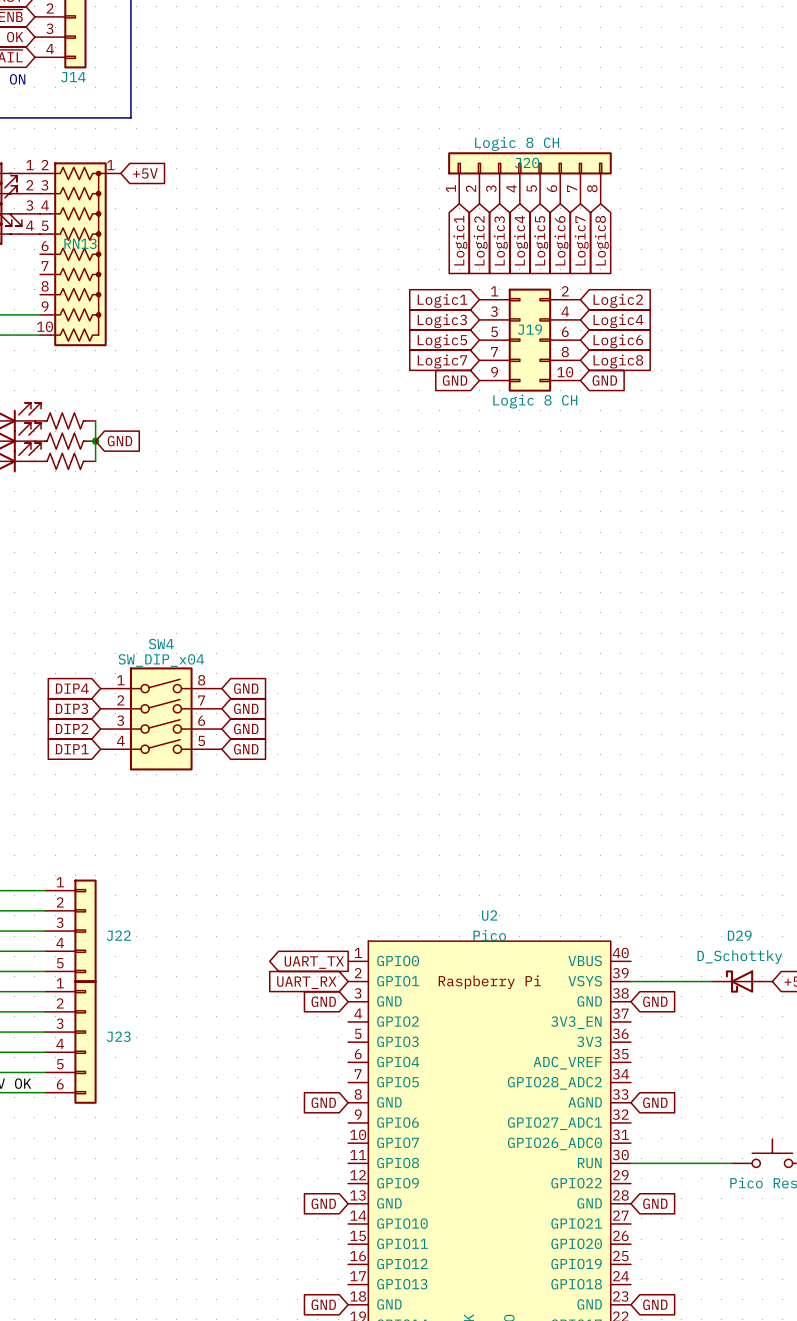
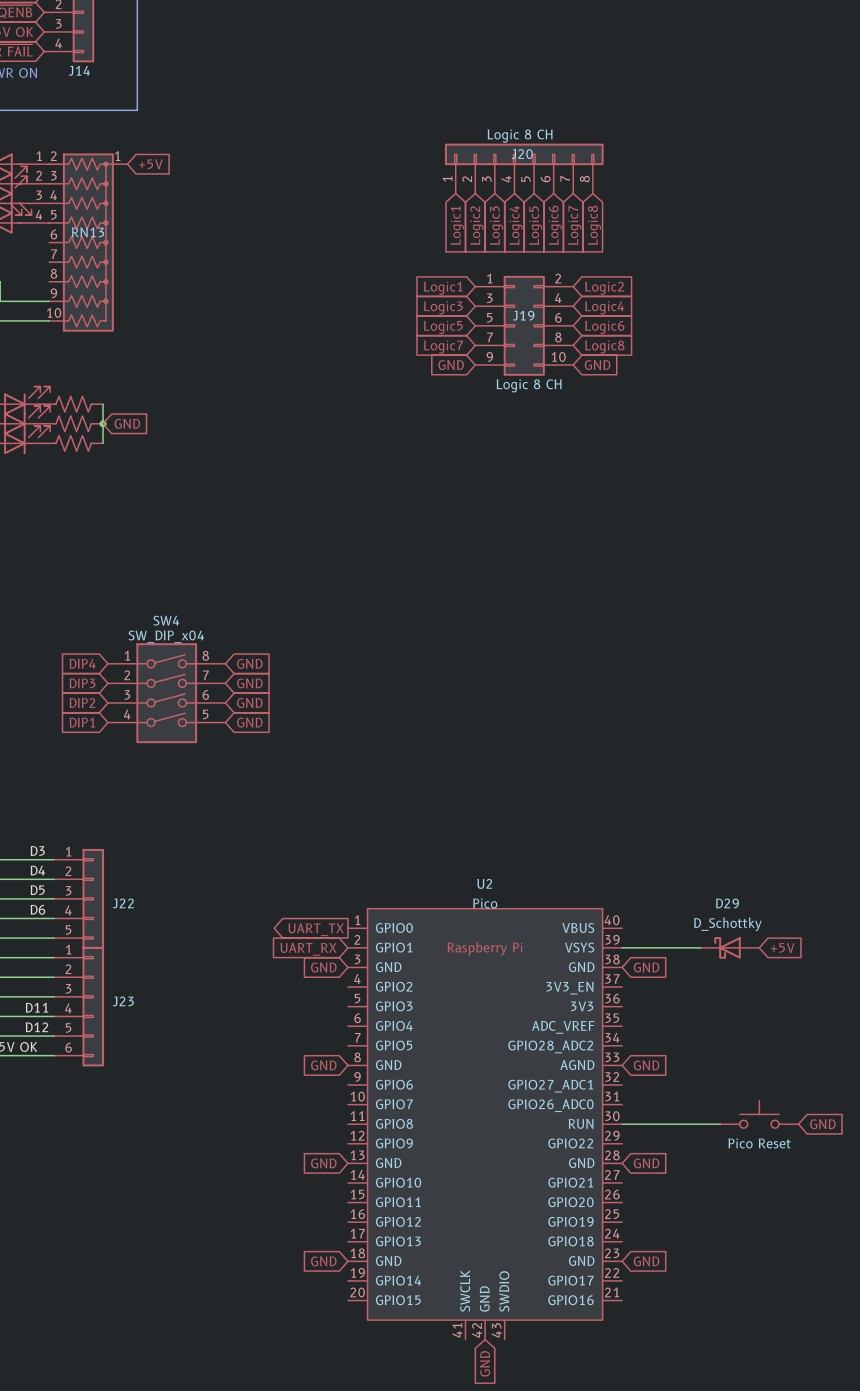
label: none -> D3 (37, 851)
label: none -> D4 (37, 870)
label: none -> D5 (37, 890)
label: none -> D6 (37, 909)
label: none -> D11 (36, 1007)
label: none -> D12 (37, 1027)

